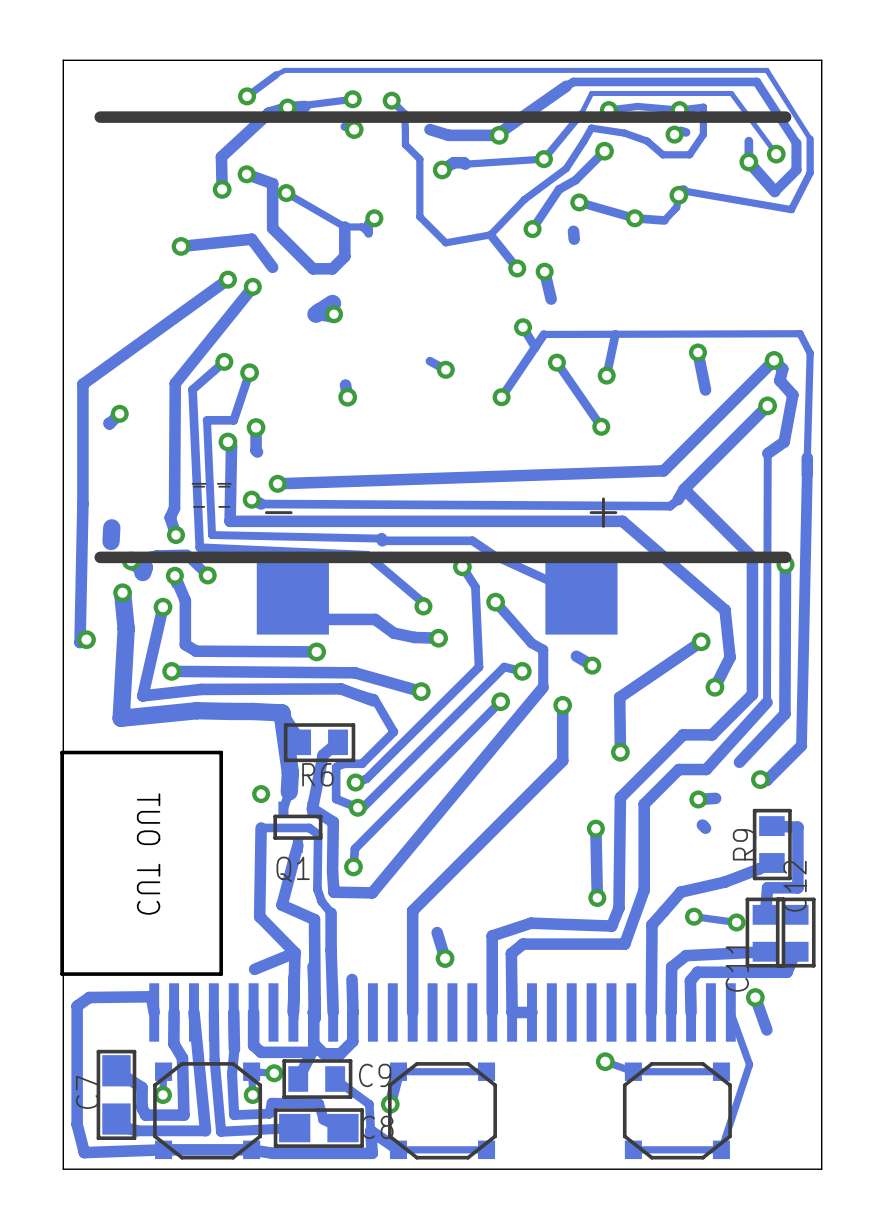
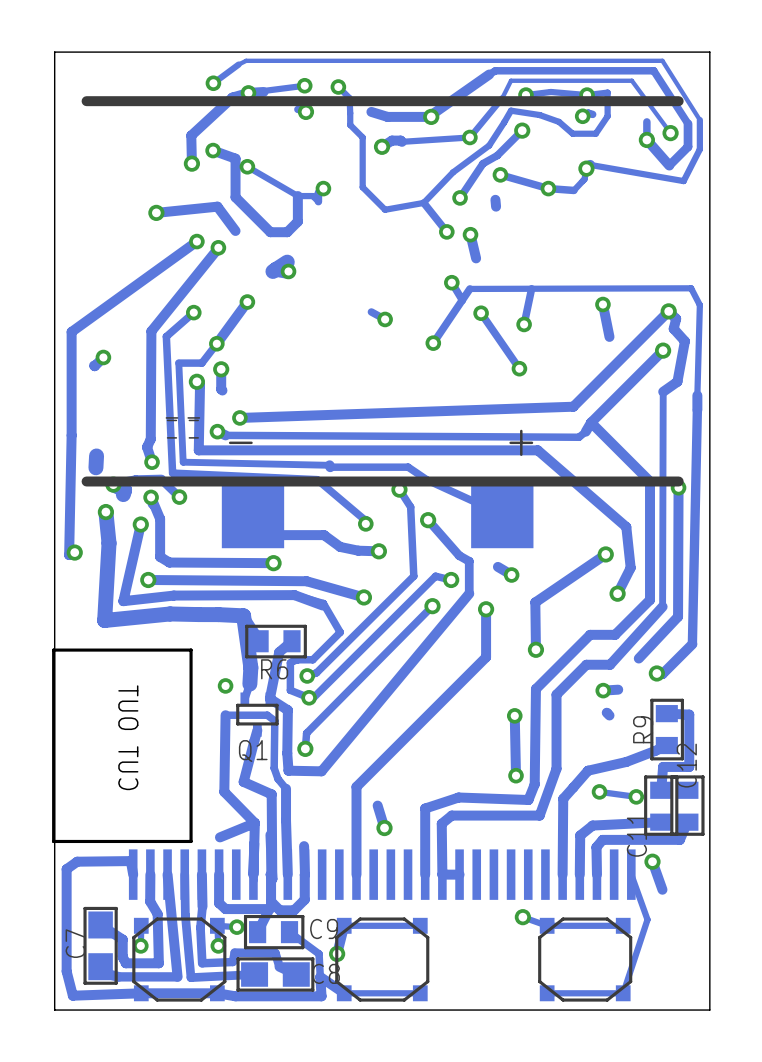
via: none -> (247, 302)
track: (249, 372) (233, 420) -> (247, 302) (201, 363)
via: (249, 372) -> none
track: (345, 384) (347, 397) -> none
via: none -> (216, 343)
via: (347, 397) -> none

